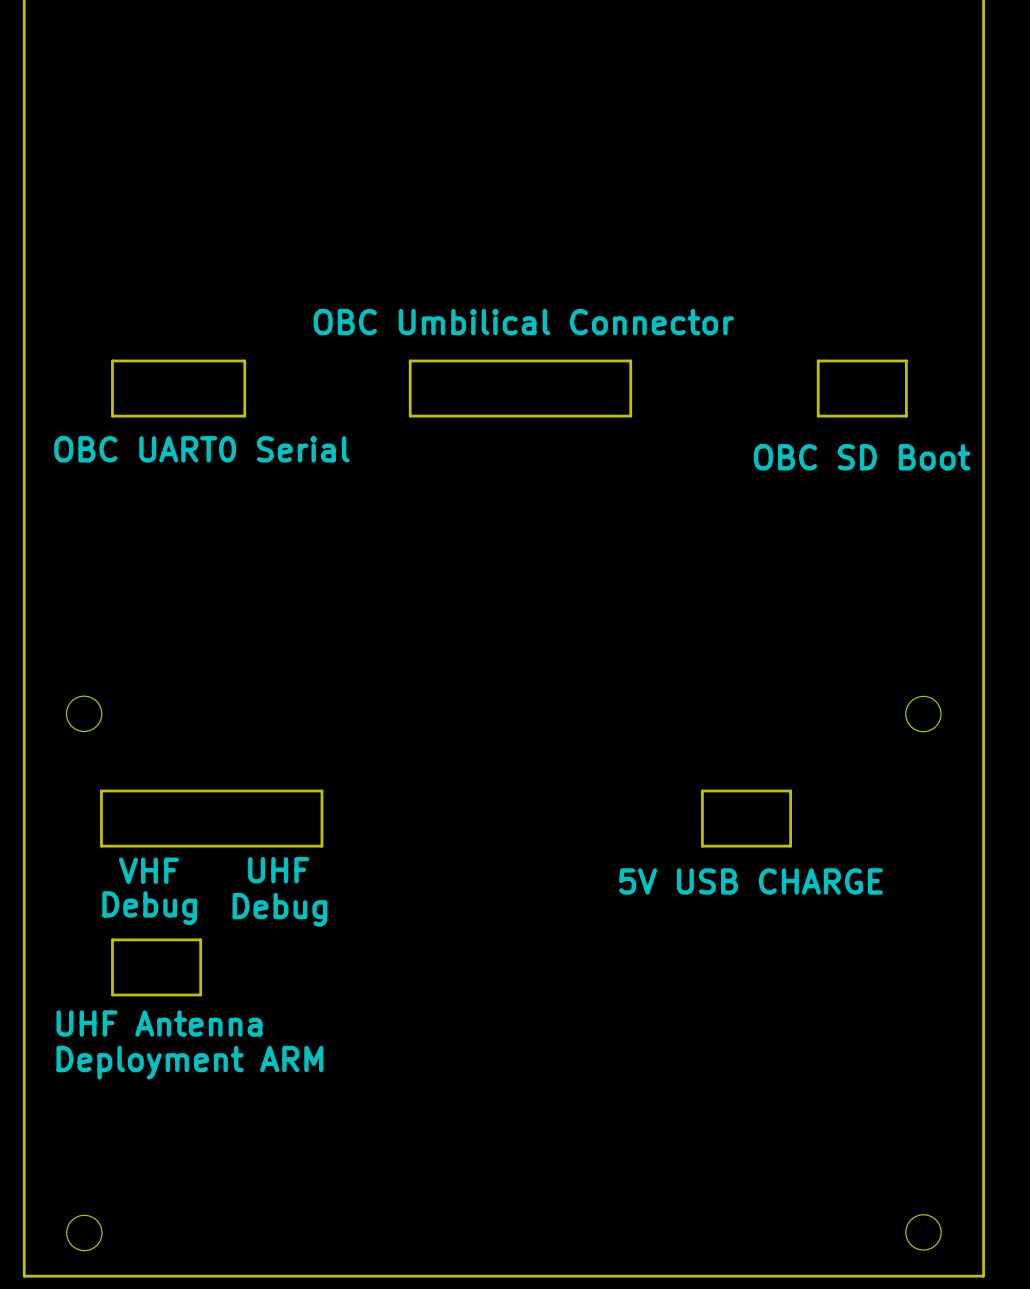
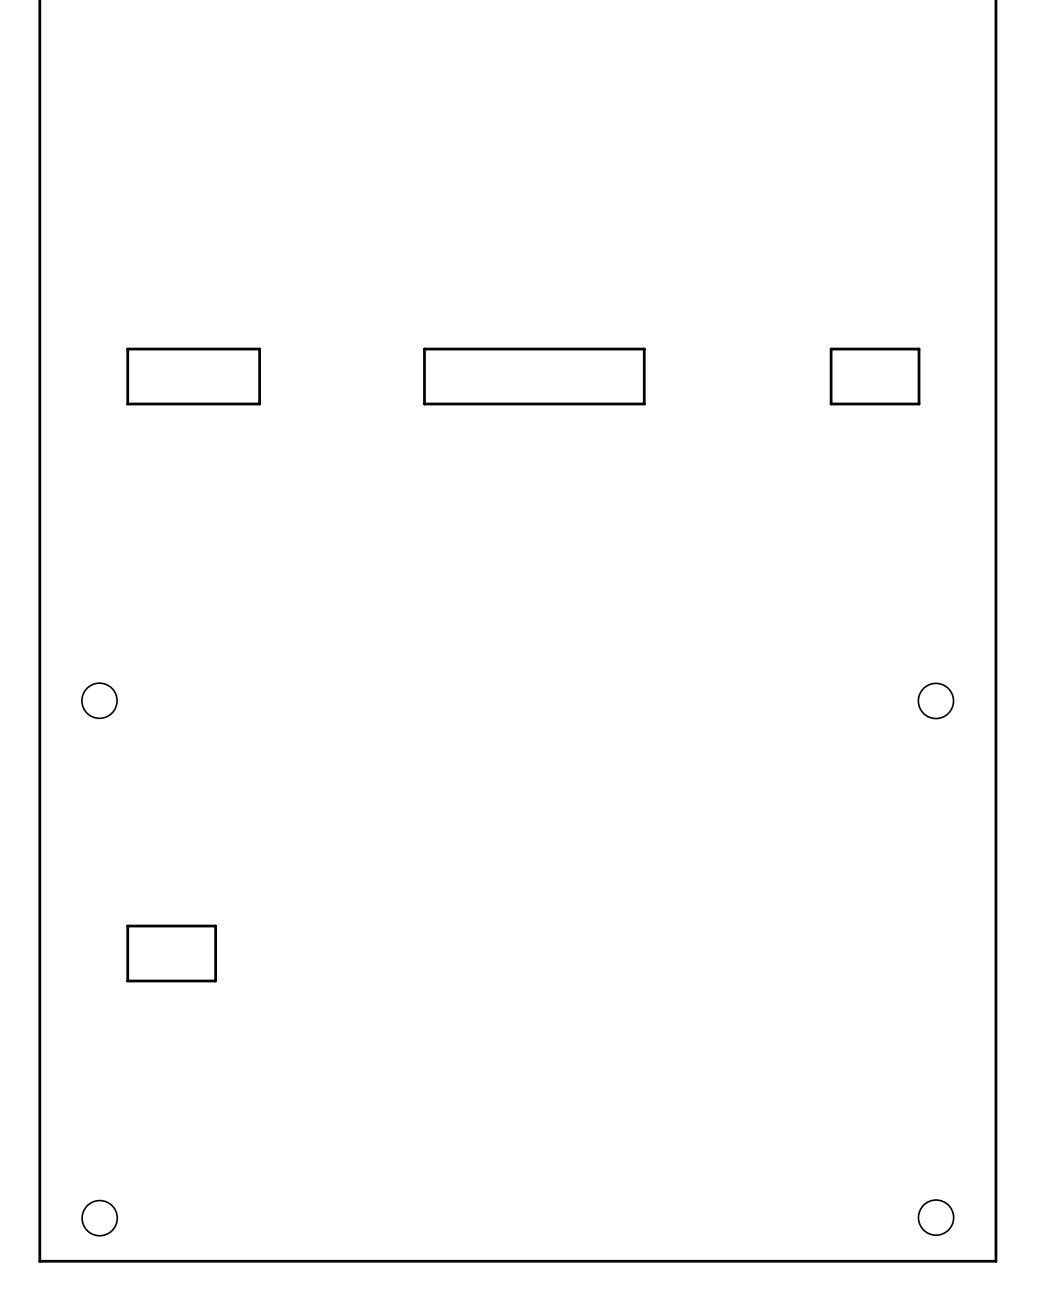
text: OBC Umbilical Connector (523, 322) -> none
text: OBC UART0 Serial (201, 449) -> none
text: OBC SD Boot (862, 457) -> none
board edge: (101, 791) (321, 791) (321, 846) (101, 846) (101, 791) -> none
board edge: (702, 791) (790, 791) (790, 846) (702, 846) (702, 791) -> none
text: VHF (148, 870) -> none
text: UHF (278, 870) -> none
text: 5V USB CHARGE (750, 881) -> none
text: Debug (149, 908) -> none
text: Debug (279, 909) -> none
text: UHF Antenna (159, 1023) -> none
text: Deployment ARM (189, 1062) -> none

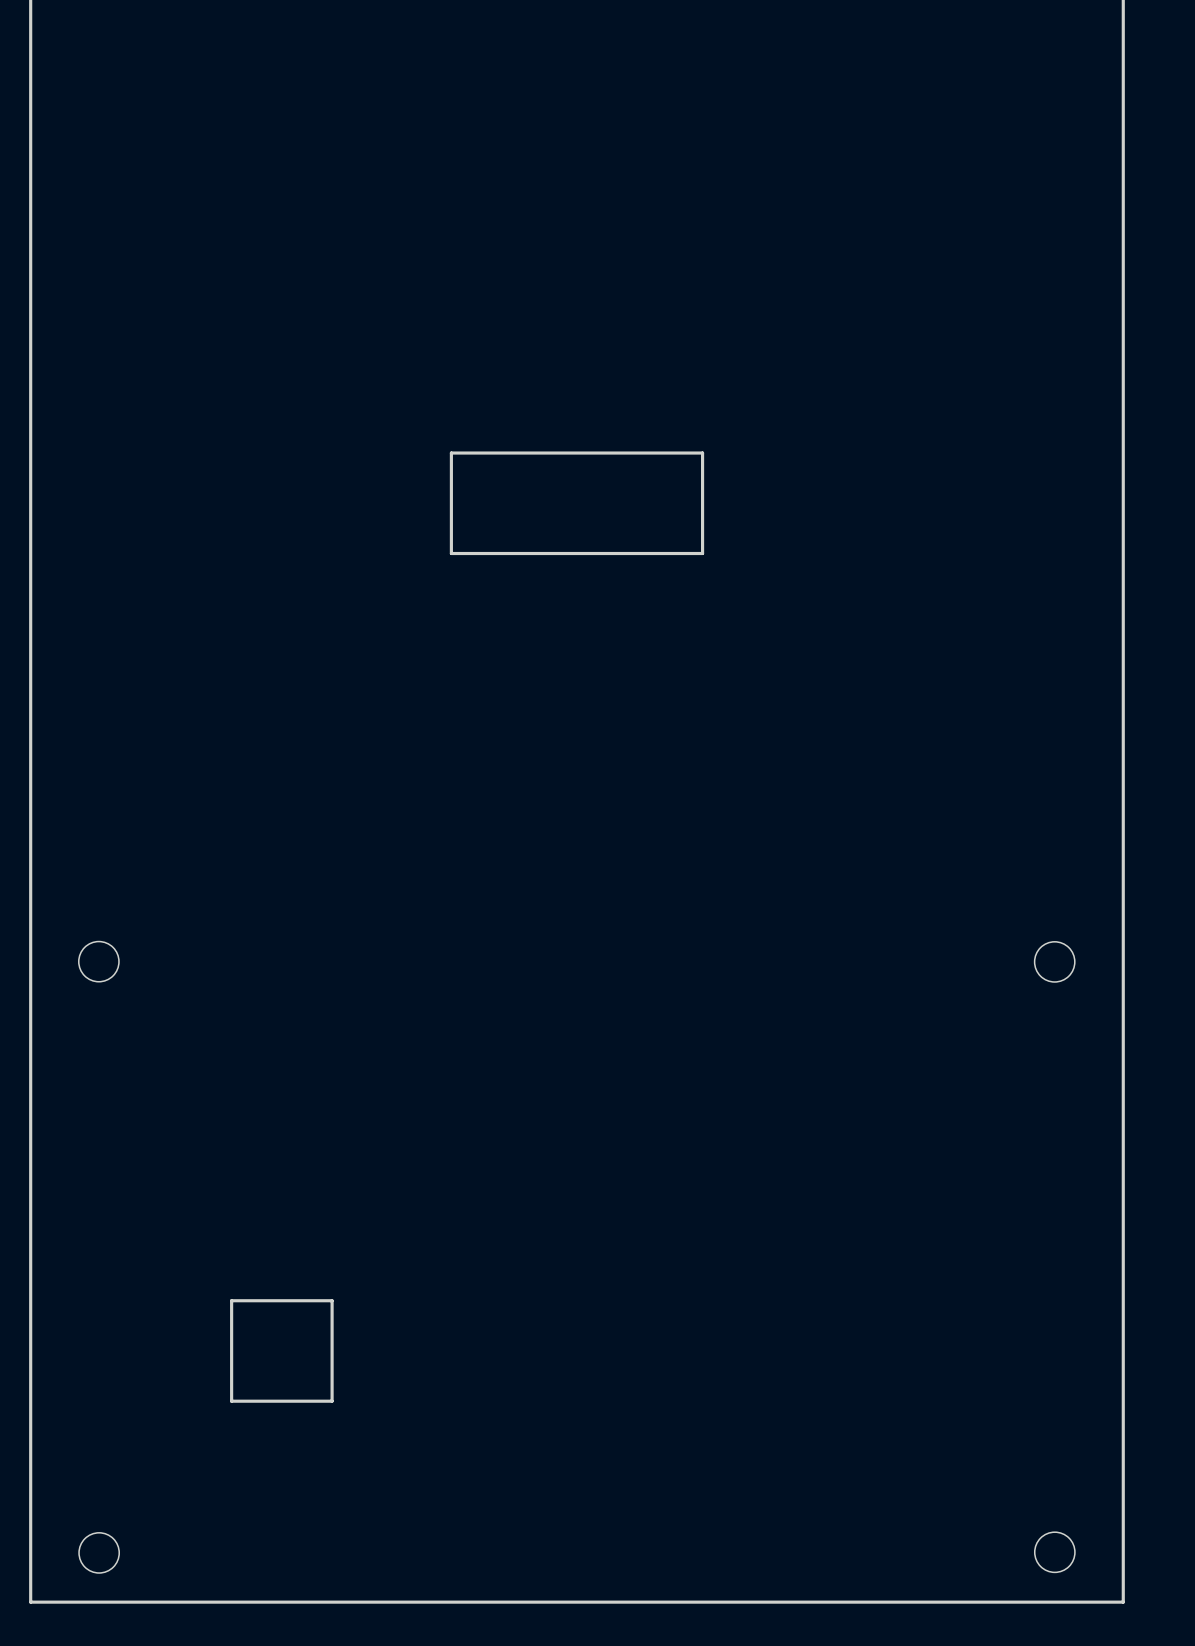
board edge: none -> (451, 453) (451, 553) (702, 553) (702, 453) (451, 453)
board edge: (127, 349) (259, 349) (259, 404) (127, 404) (127, 349) -> none
board edge: (424, 349) (644, 349) (644, 404) (424, 404) (424, 349) -> none
board edge: (831, 349) (919, 349) (919, 404) (831, 404) (831, 349) -> none
board edge: (127, 926) (215, 926) (215, 980) (127, 980) (127, 926) -> none
board edge: none -> (231, 1300) (231, 1401) (332, 1401) (332, 1300) (231, 1300)

